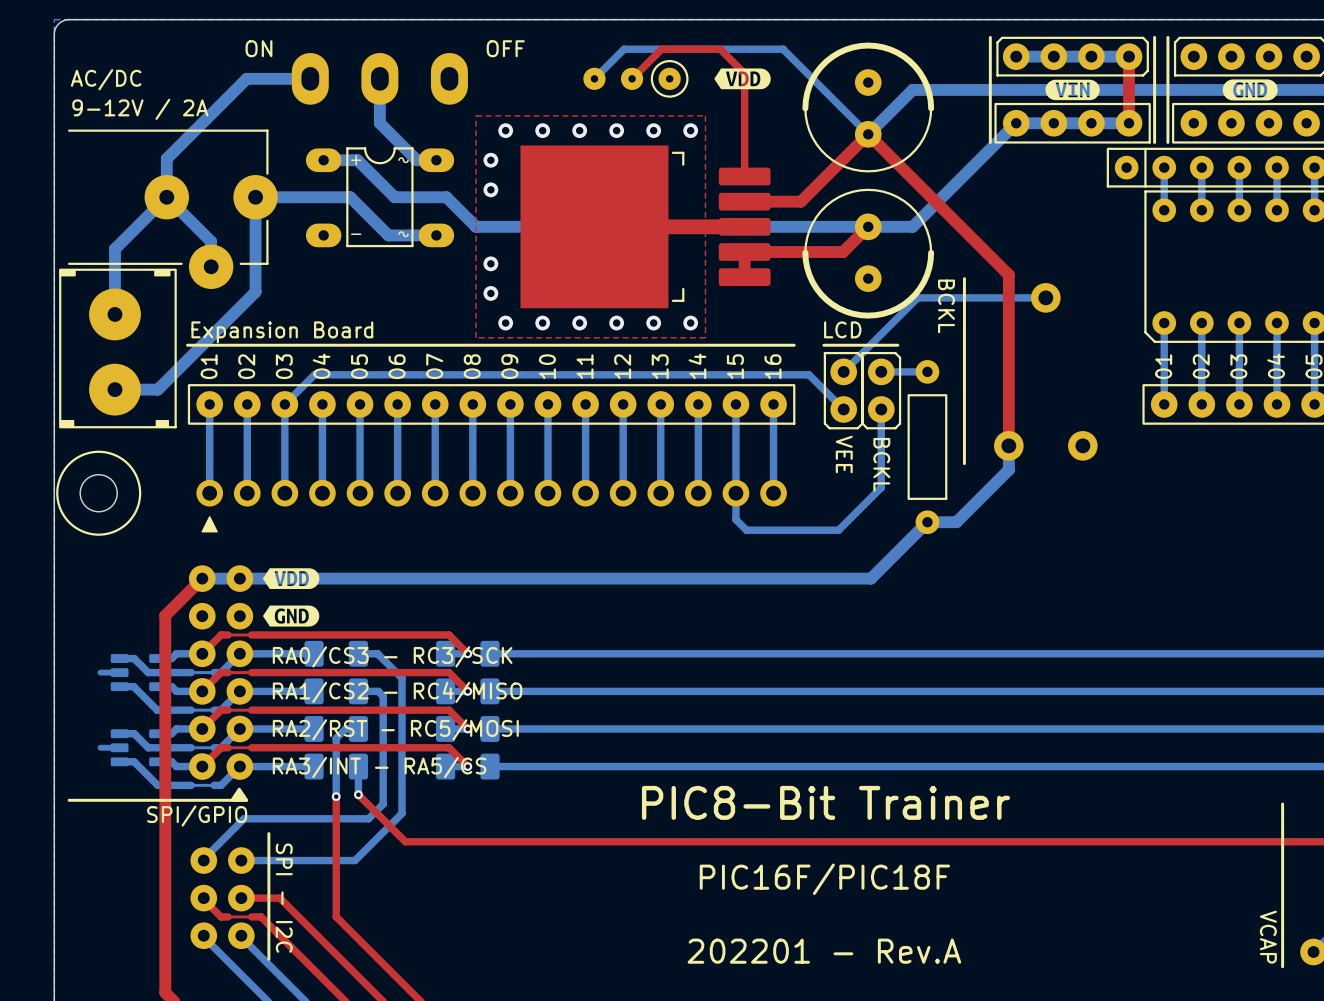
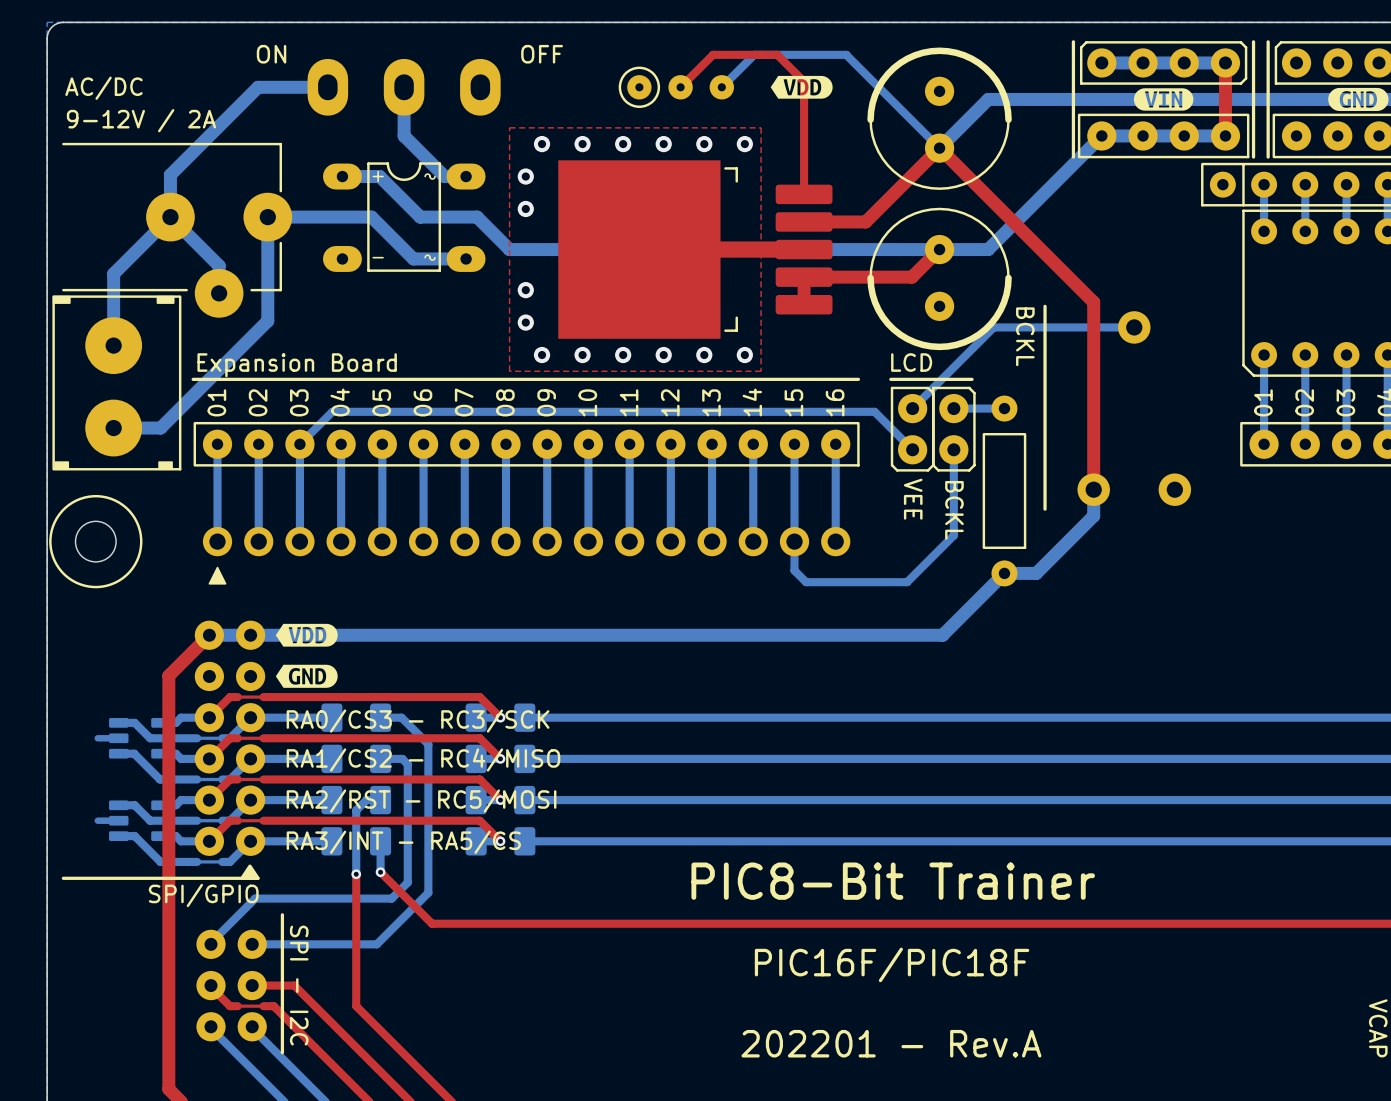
bottom track: (699, 49) (624, 49) (594, 78) -> (754, 54) (721, 87)
part rotation: 0° (635, 78) -> 180° (676, 87)

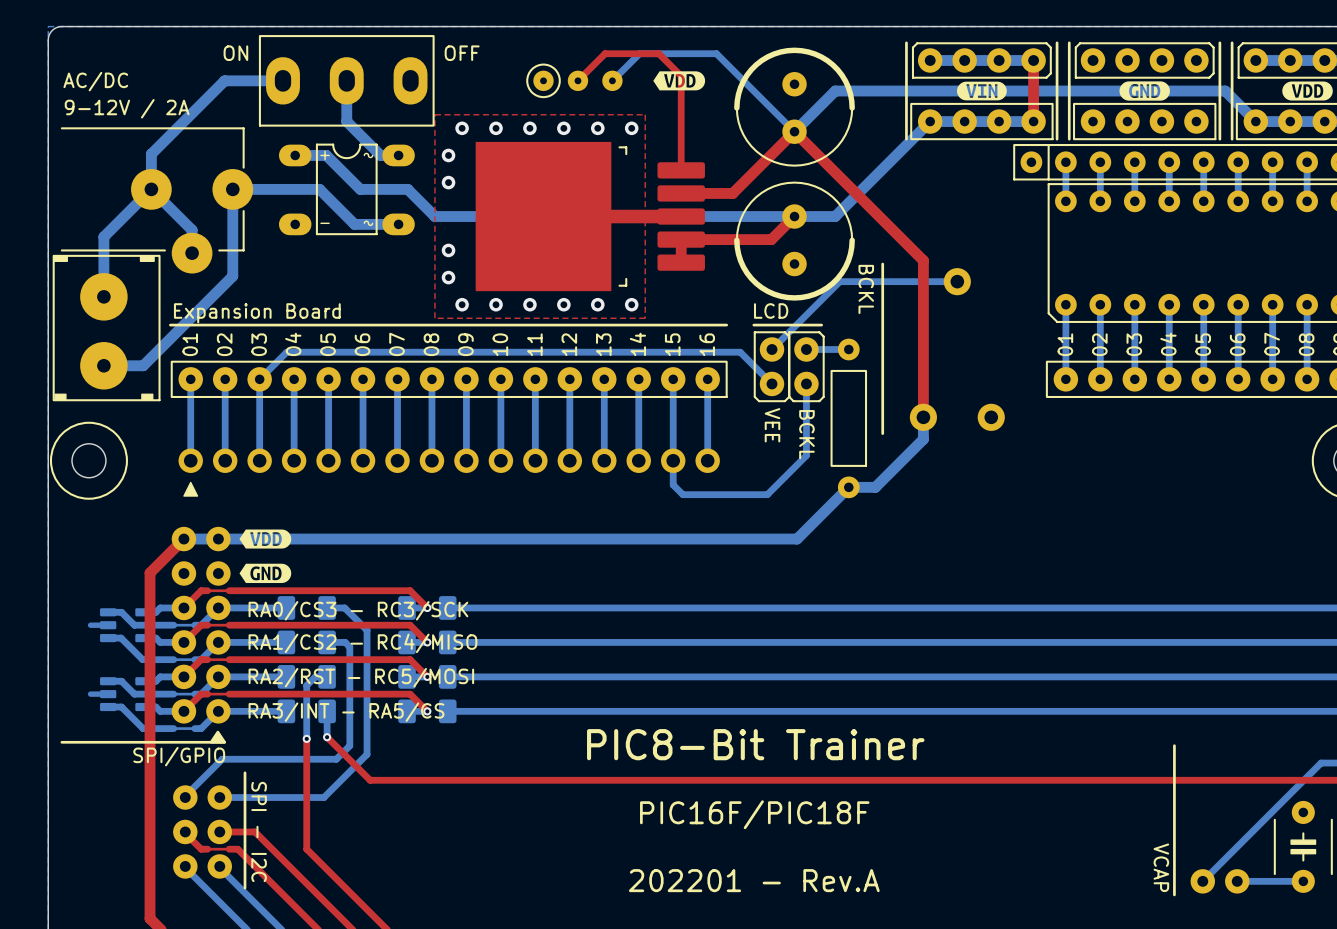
part footprint: [307, 58, 501, 116] -> [258, 35, 435, 127]
part footprint: [558, 160, 833, 339] -> [475, 141, 705, 292]

